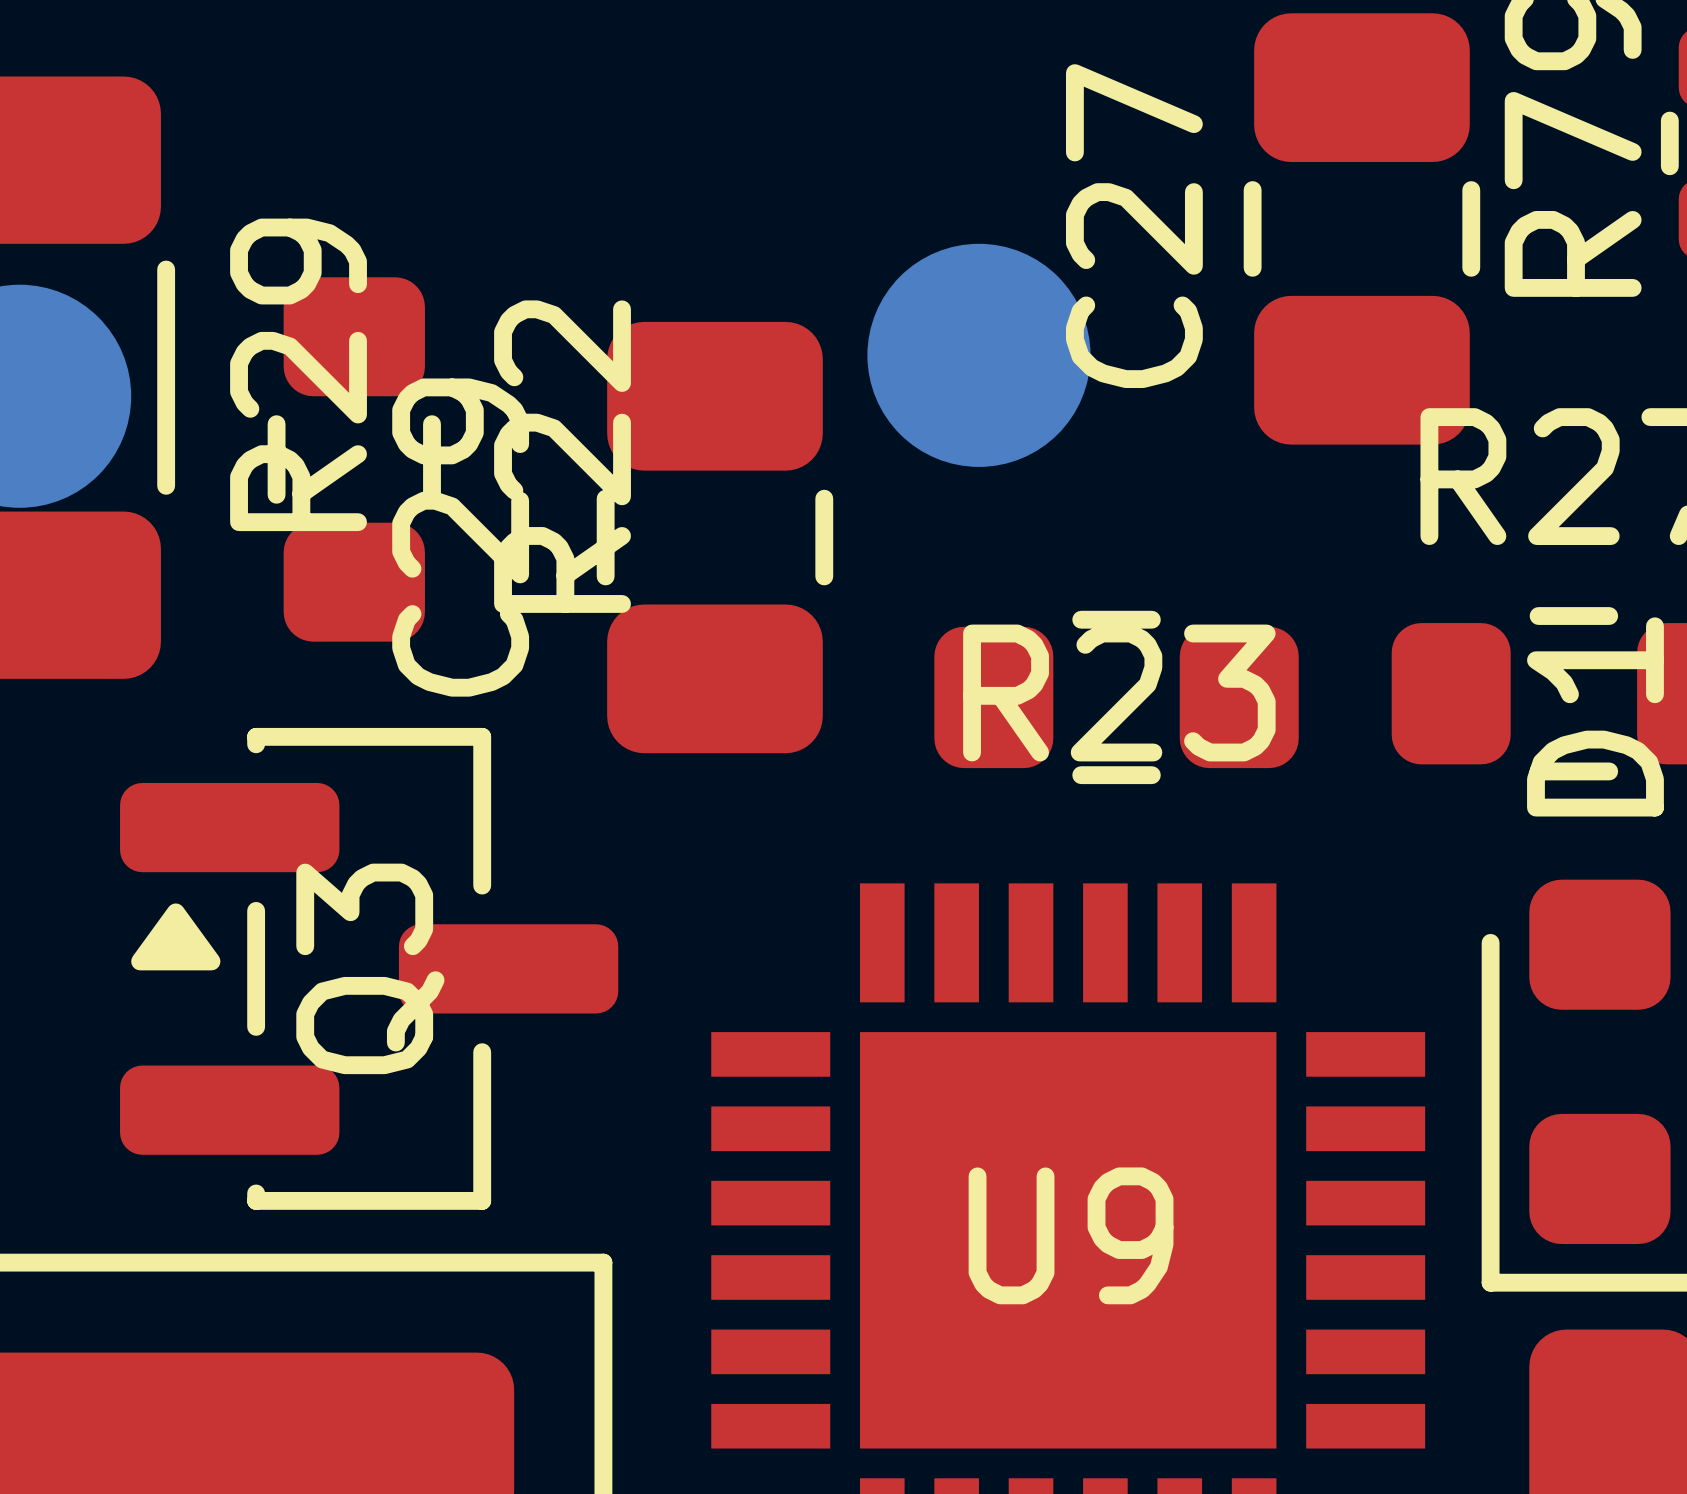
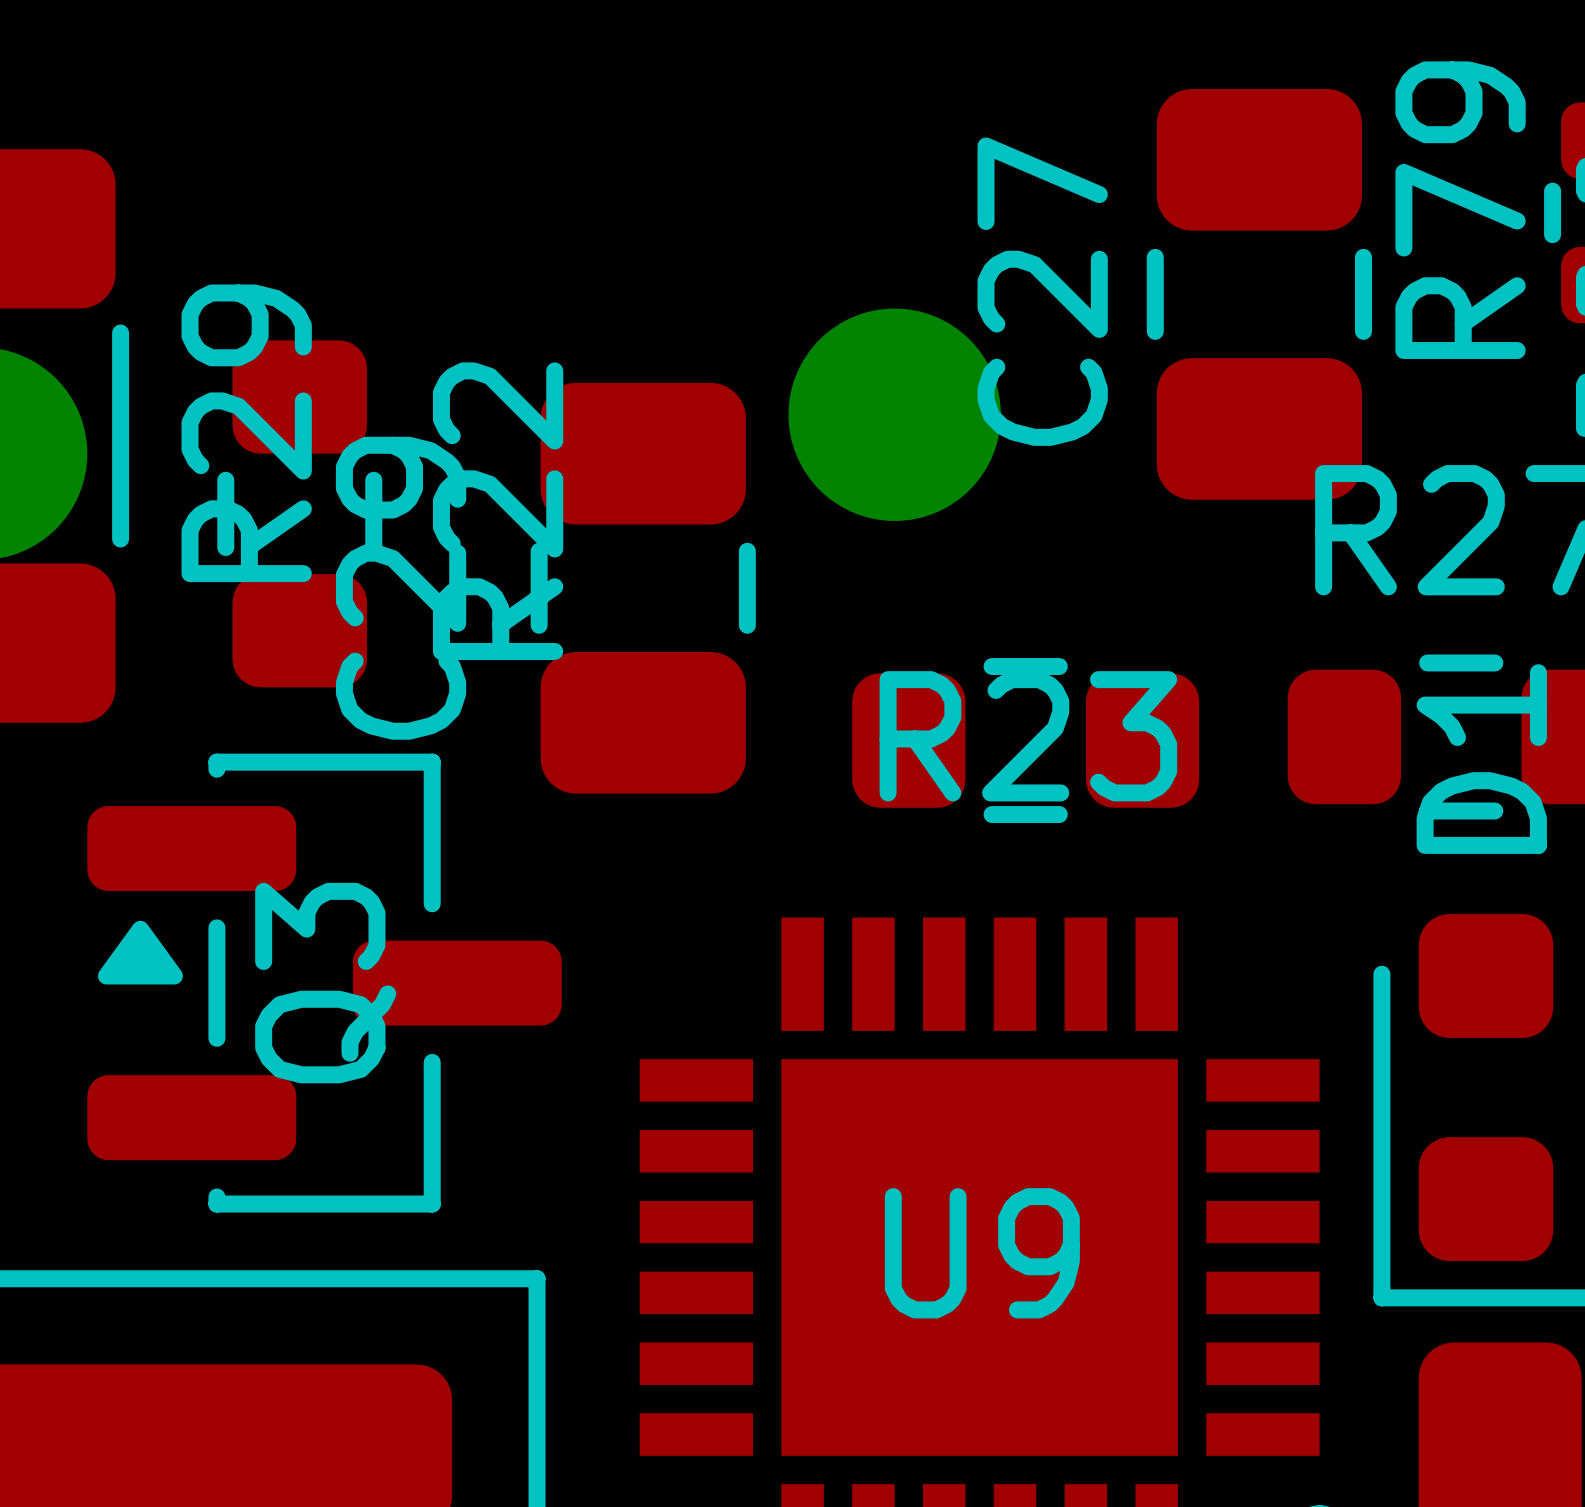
Q3 position: (369, 968) -> (324, 983)

